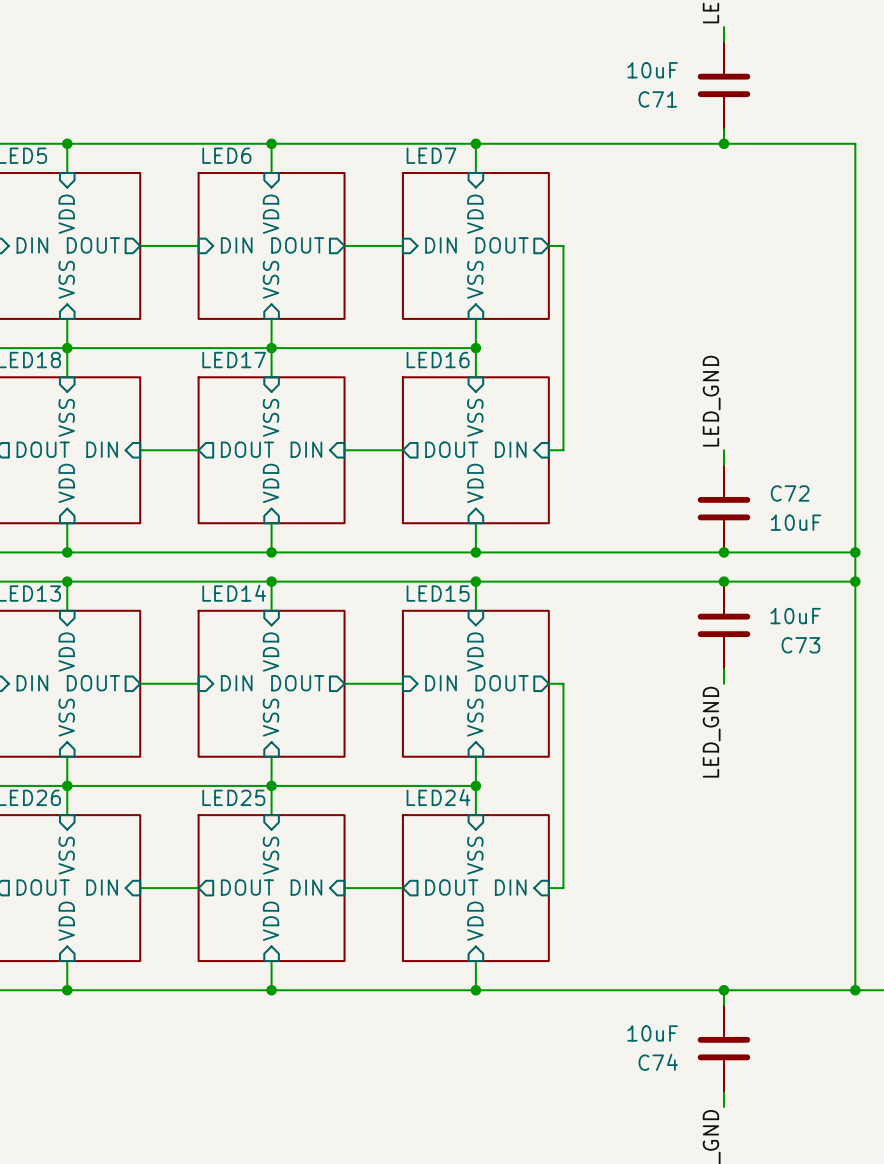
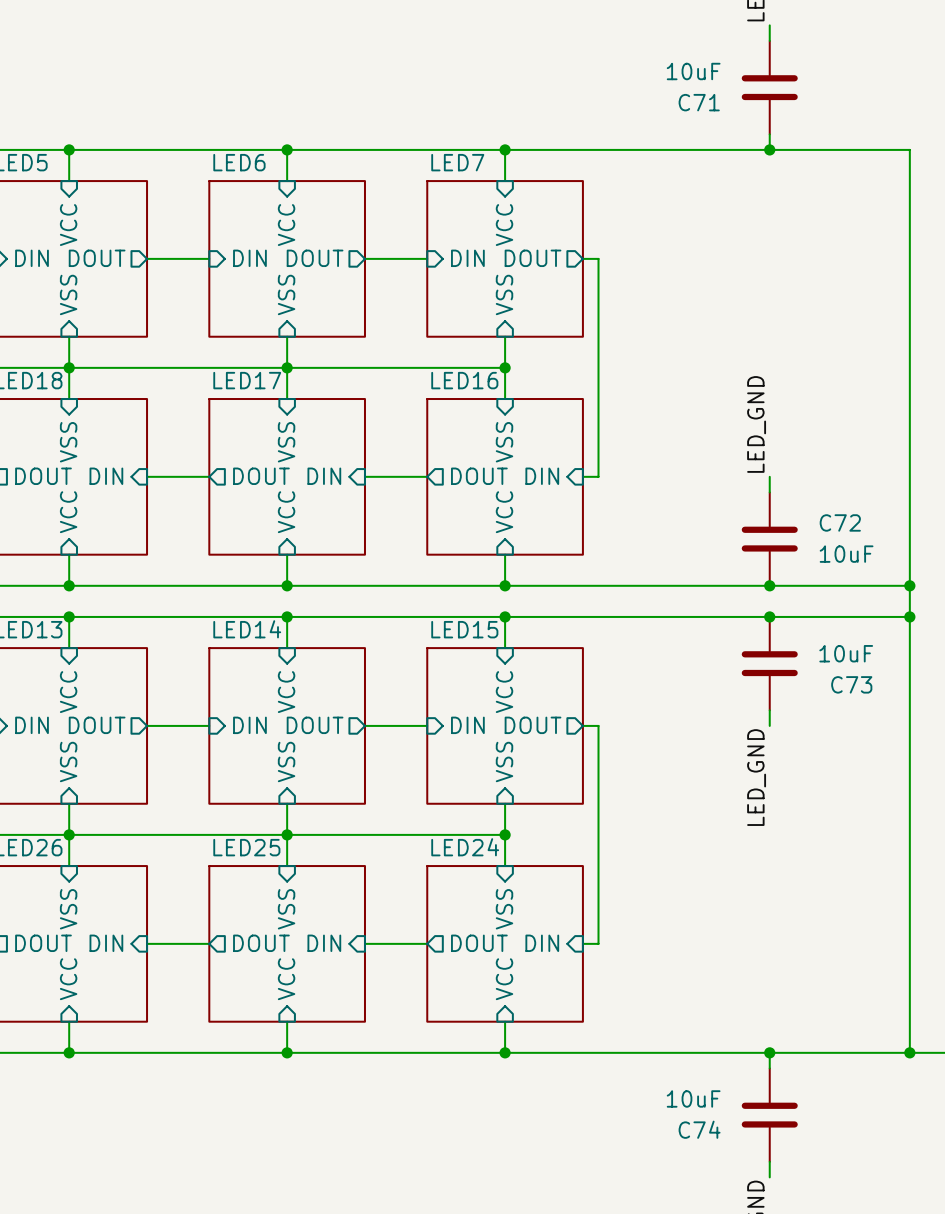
sheet pin: VDD (66, 214) -> VCC (68, 225)
sheet pin: VDD (271, 214) -> VCC (286, 225)
sheet pin: VDD (475, 214) -> VCC (504, 225)
sheet pin: VDD (66, 483) -> VCC (68, 512)
sheet pin: VDD (271, 483) -> VCC (286, 512)
sheet pin: VDD (475, 483) -> VCC (504, 512)
sheet pin: VDD (66, 652) -> VCC (68, 692)
sheet pin: VDD (271, 652) -> VCC (286, 692)
sheet pin: VDD (475, 652) -> VCC (504, 692)
sheet pin: VDD (66, 921) -> VCC (68, 979)
sheet pin: VDD (271, 921) -> VCC (286, 979)
sheet pin: VDD (475, 921) -> VCC (504, 979)

